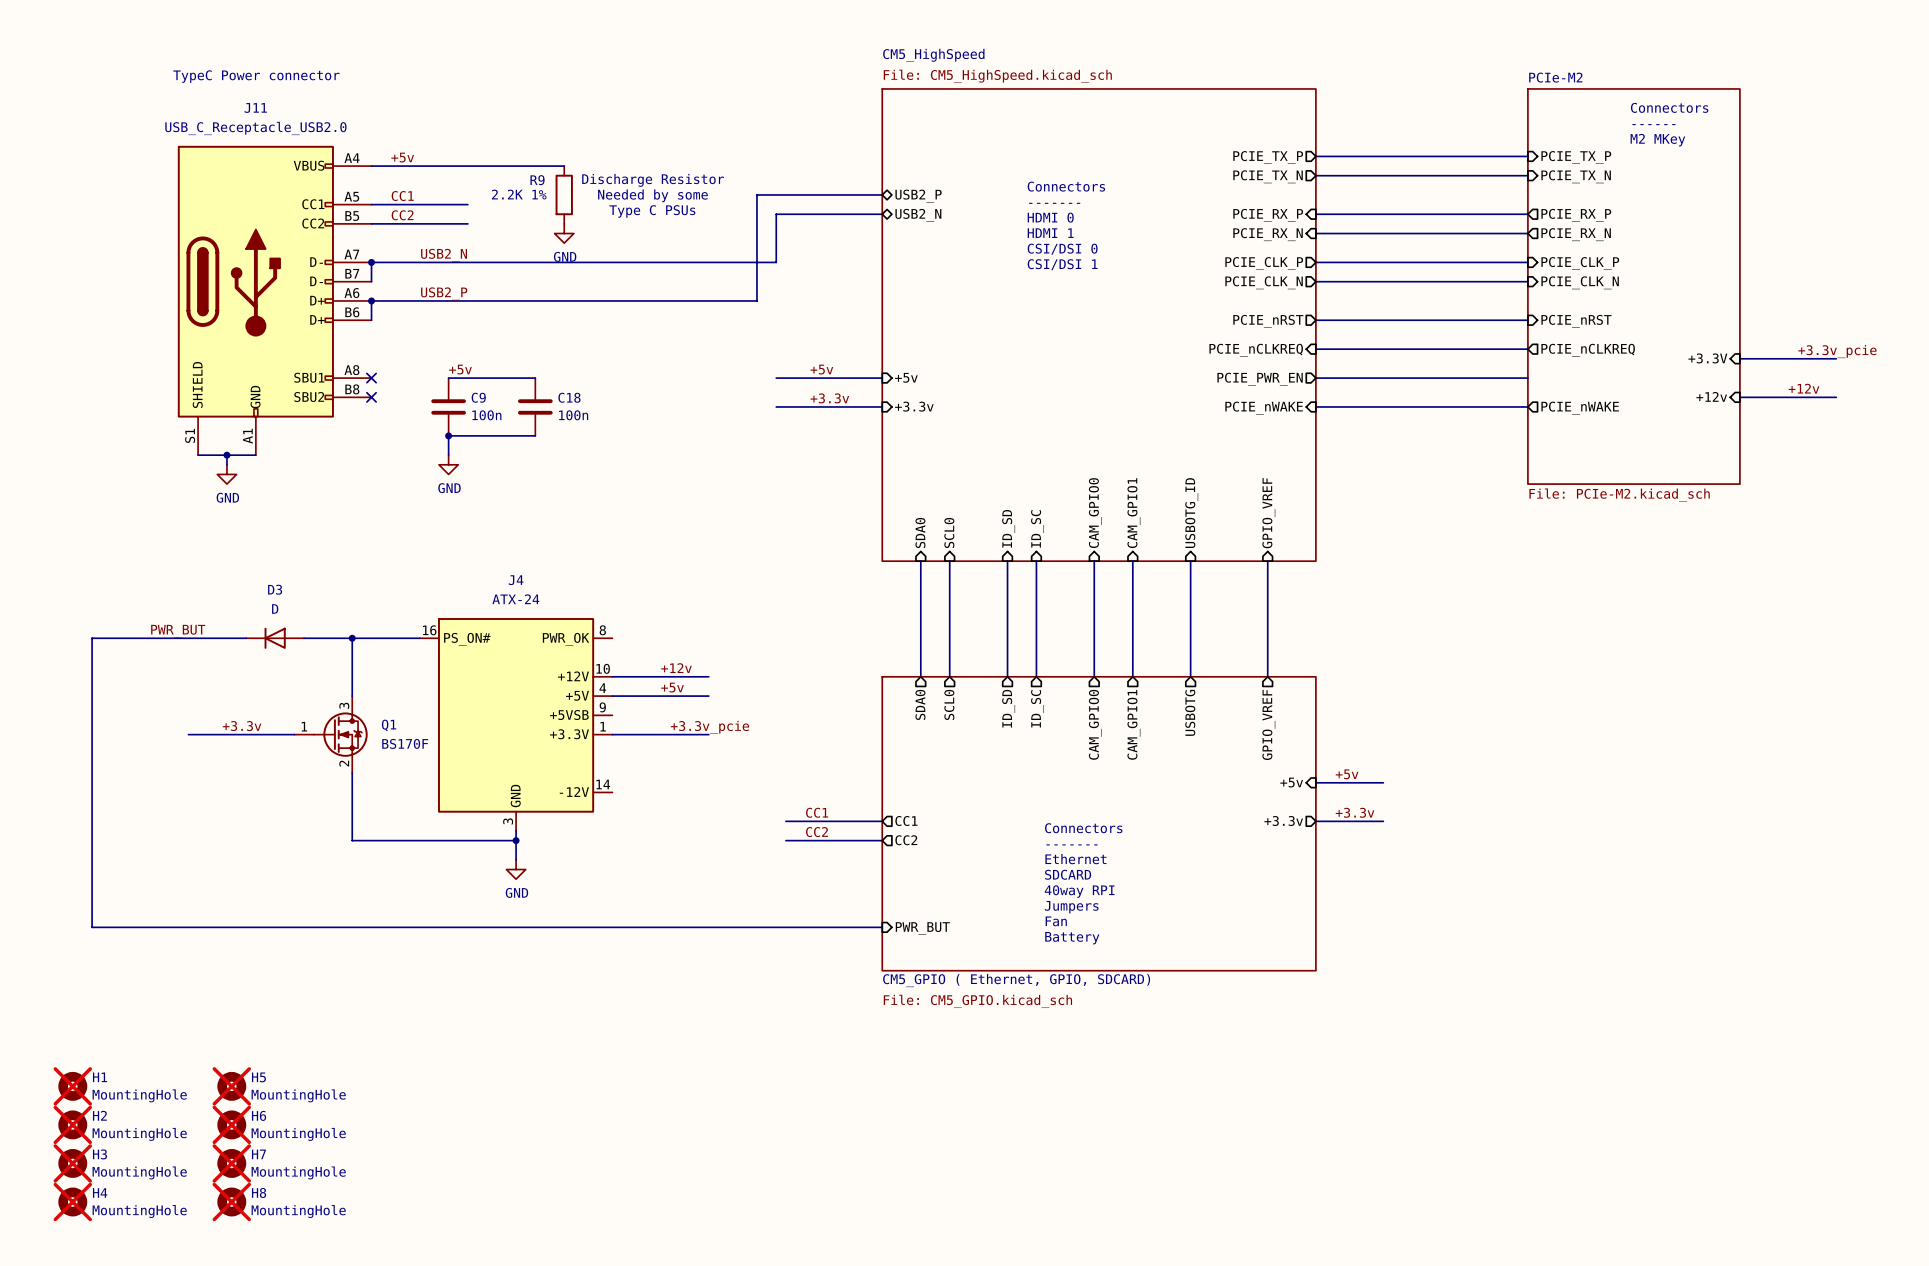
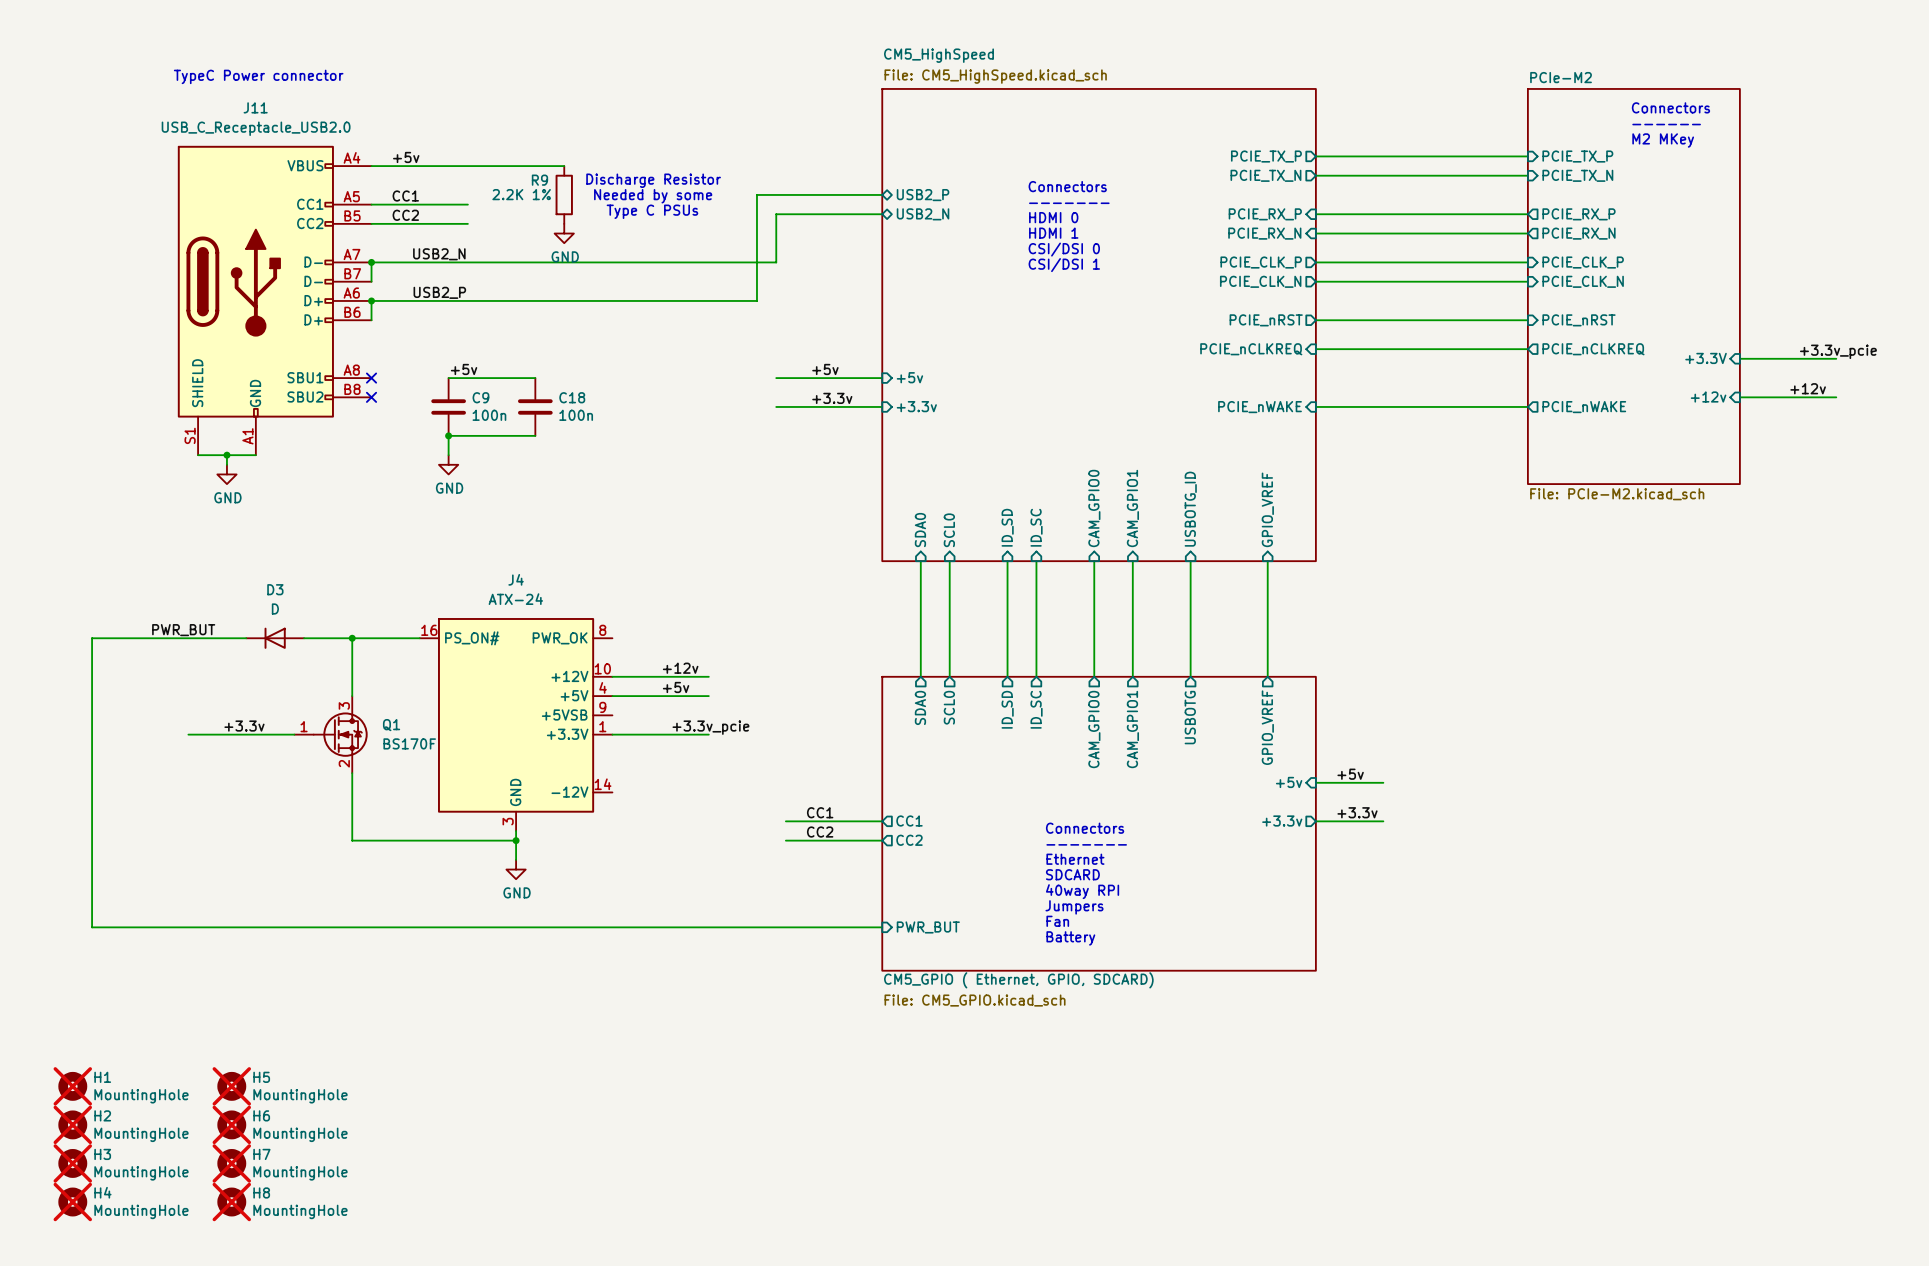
wire: (1315, 378) (1527, 378) -> none
sheet pin: PCIE_PWR_EN (1260, 379) -> none

